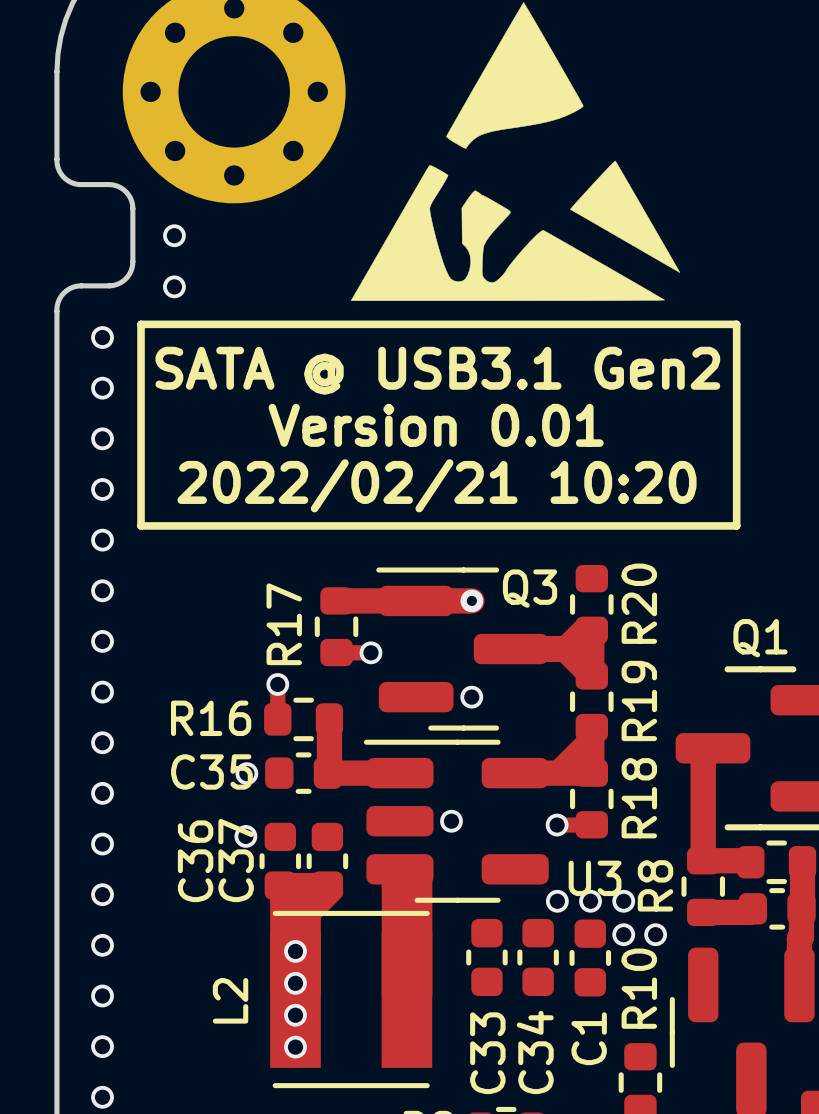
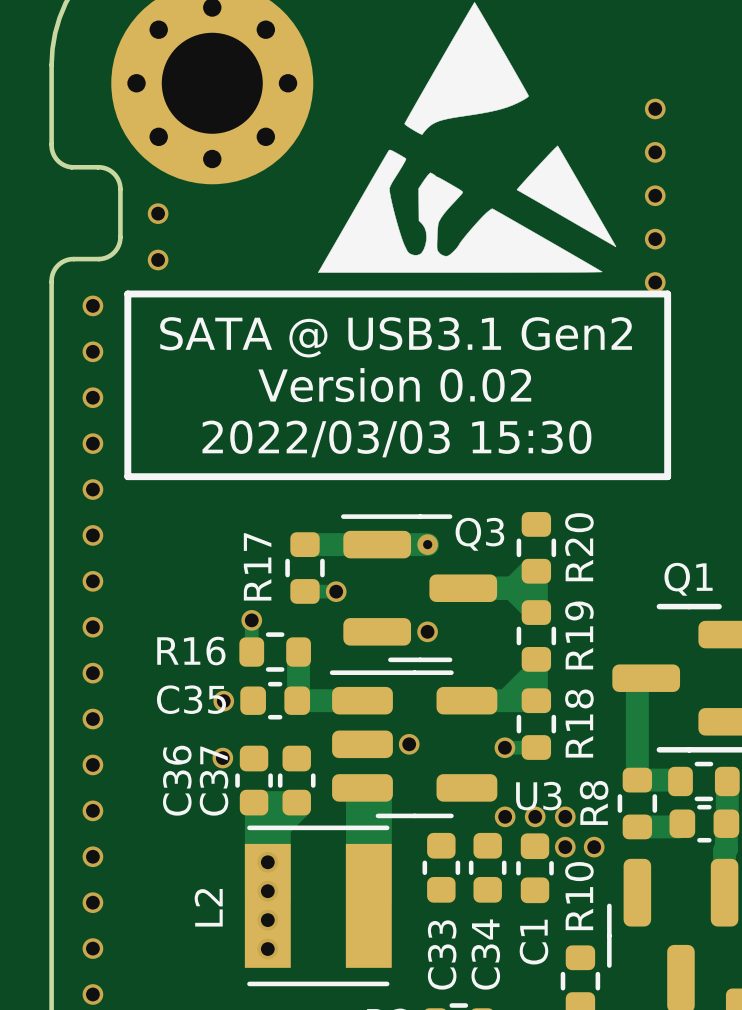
via: none -> (655, 108)
via: none -> (655, 152)
via: none -> (655, 195)
via: none -> (655, 239)
via: none -> (655, 282)
text: Version 0.01 (436, 425) -> Version 0.02 (394, 385)
text: 2022/02/21 10:20 (436, 485) -> 2022/03/03 15:30 (396, 438)

